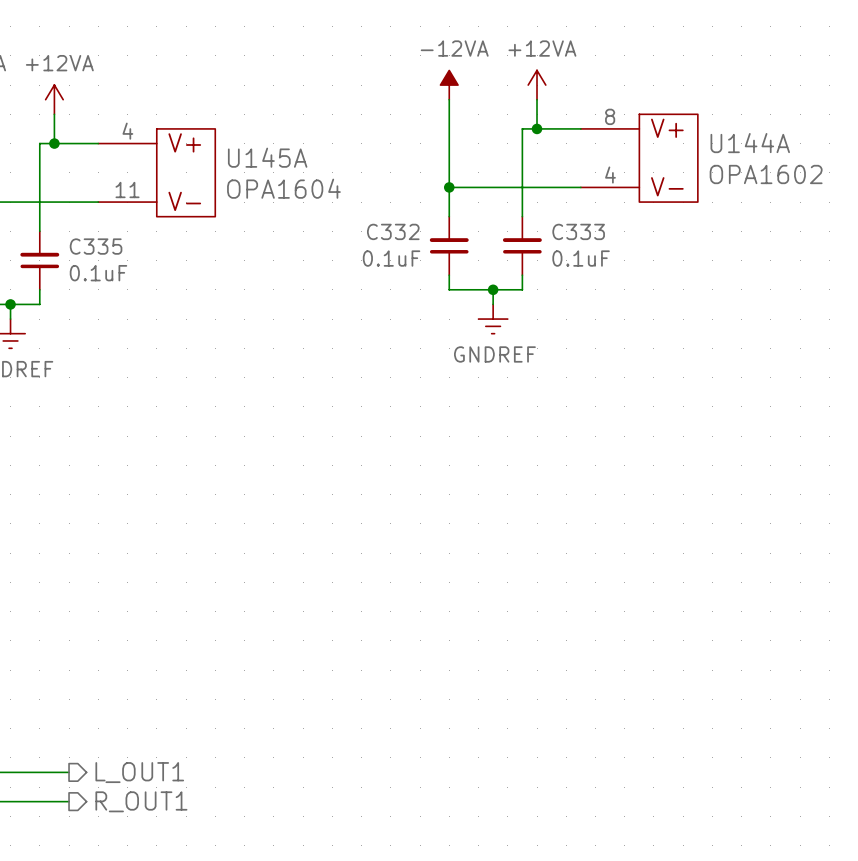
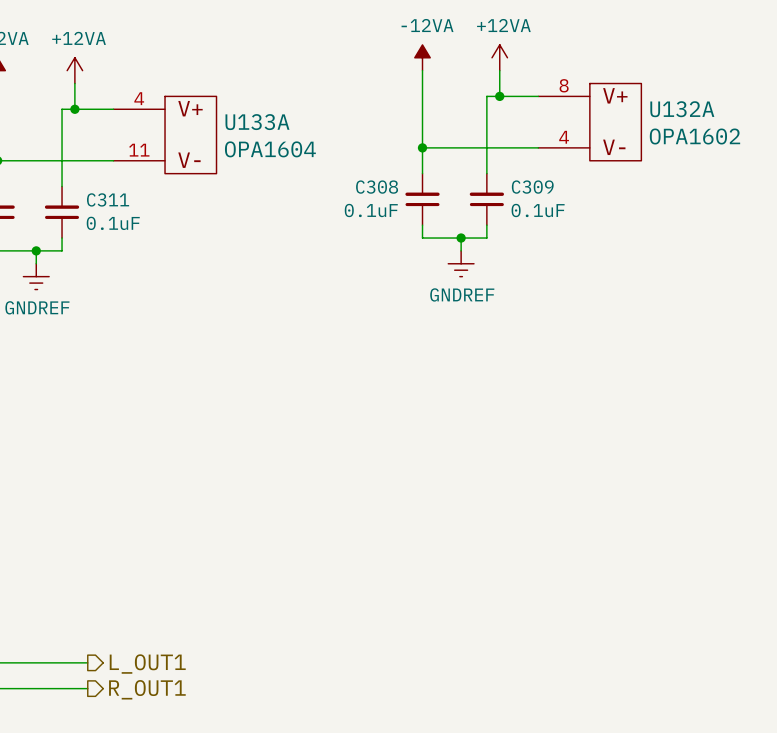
U144A name: U144A (750, 143) -> U132A (682, 109)
U145A name: U145A (267, 157) -> U133A (257, 122)
C332 name: C332 (393, 231) -> C308 (377, 187)
C333 name: C333 (578, 231) -> C309 (532, 187)
C335 name: C335 (96, 246) -> C311 (108, 199)

